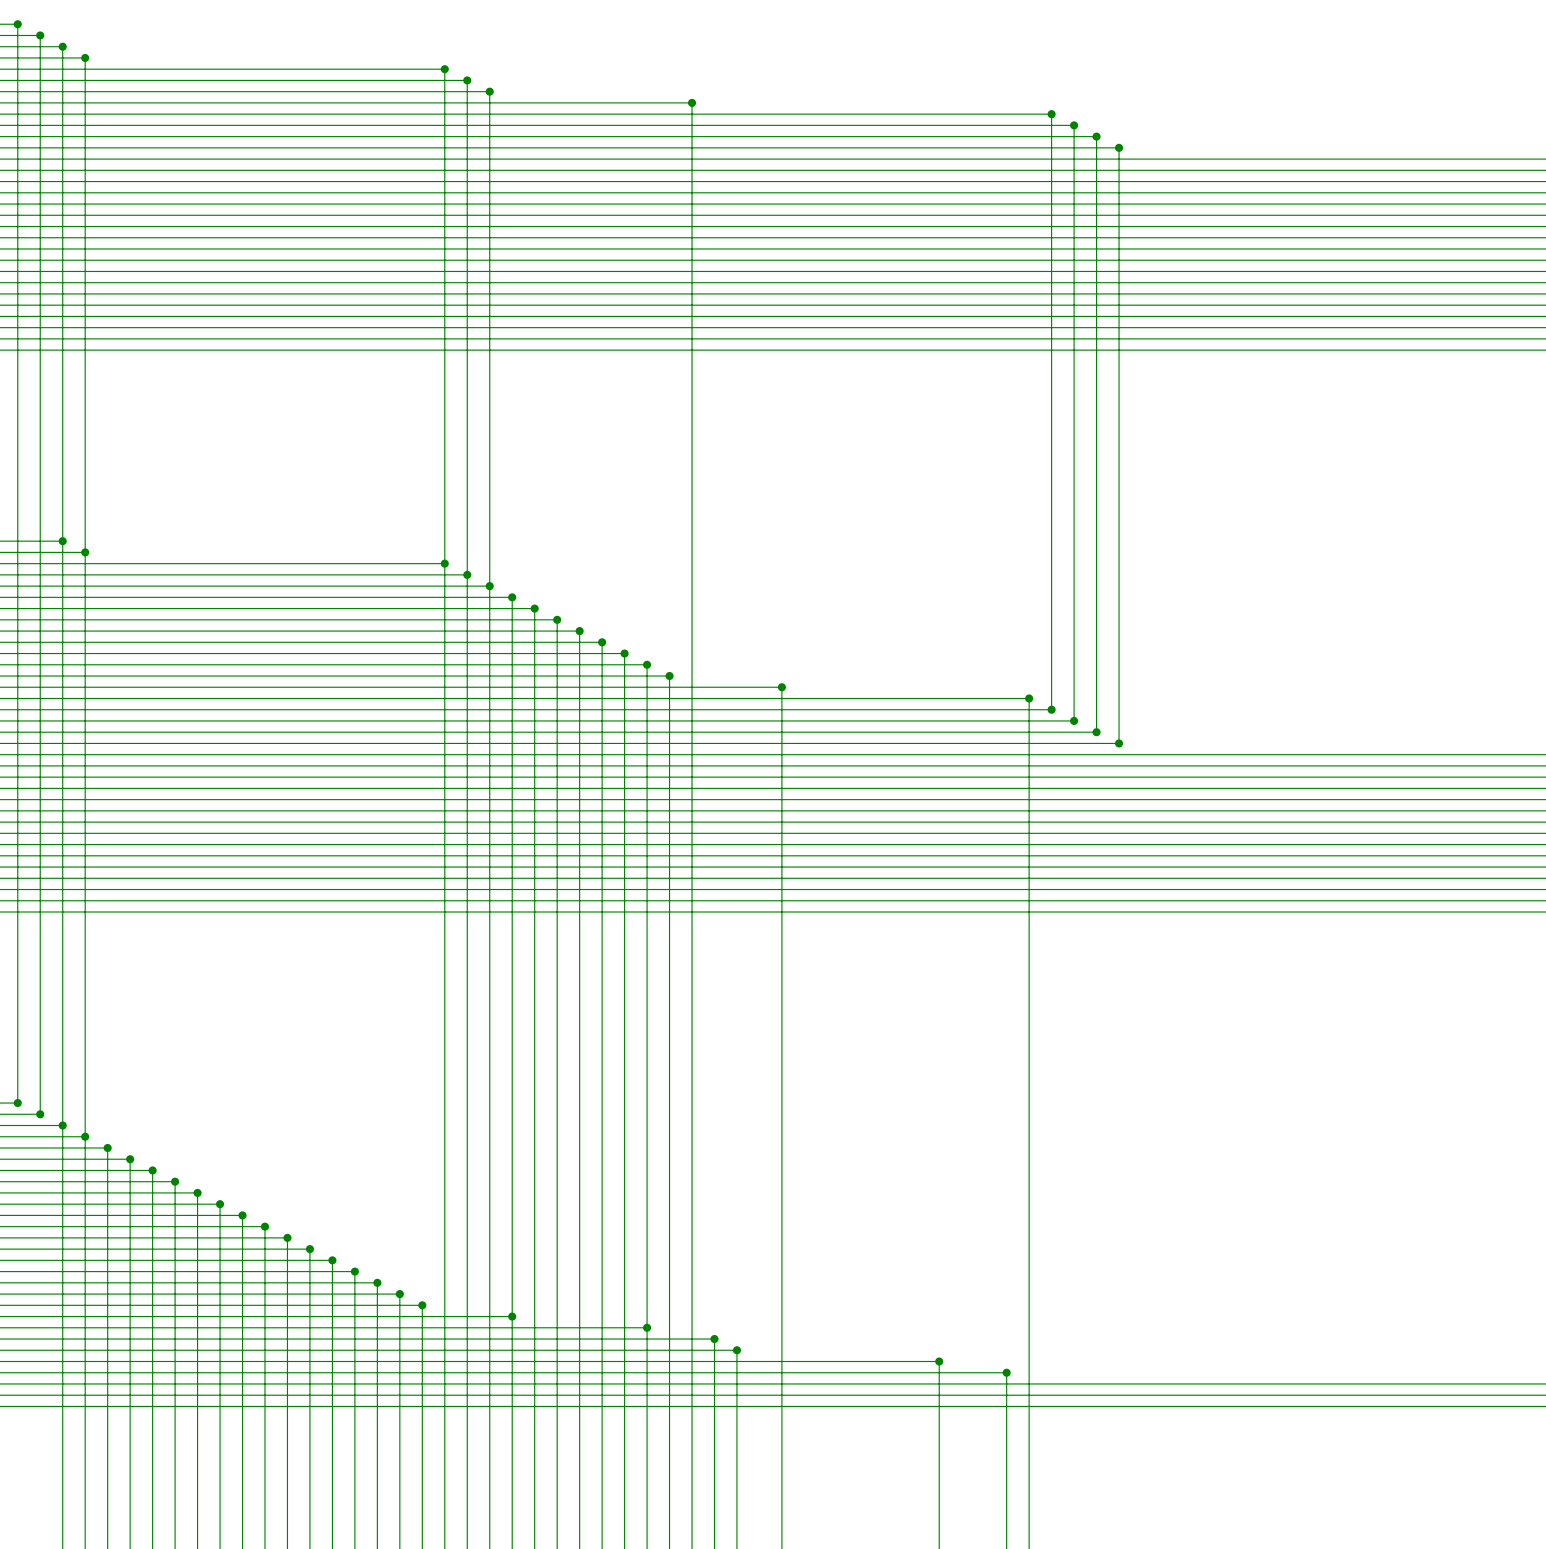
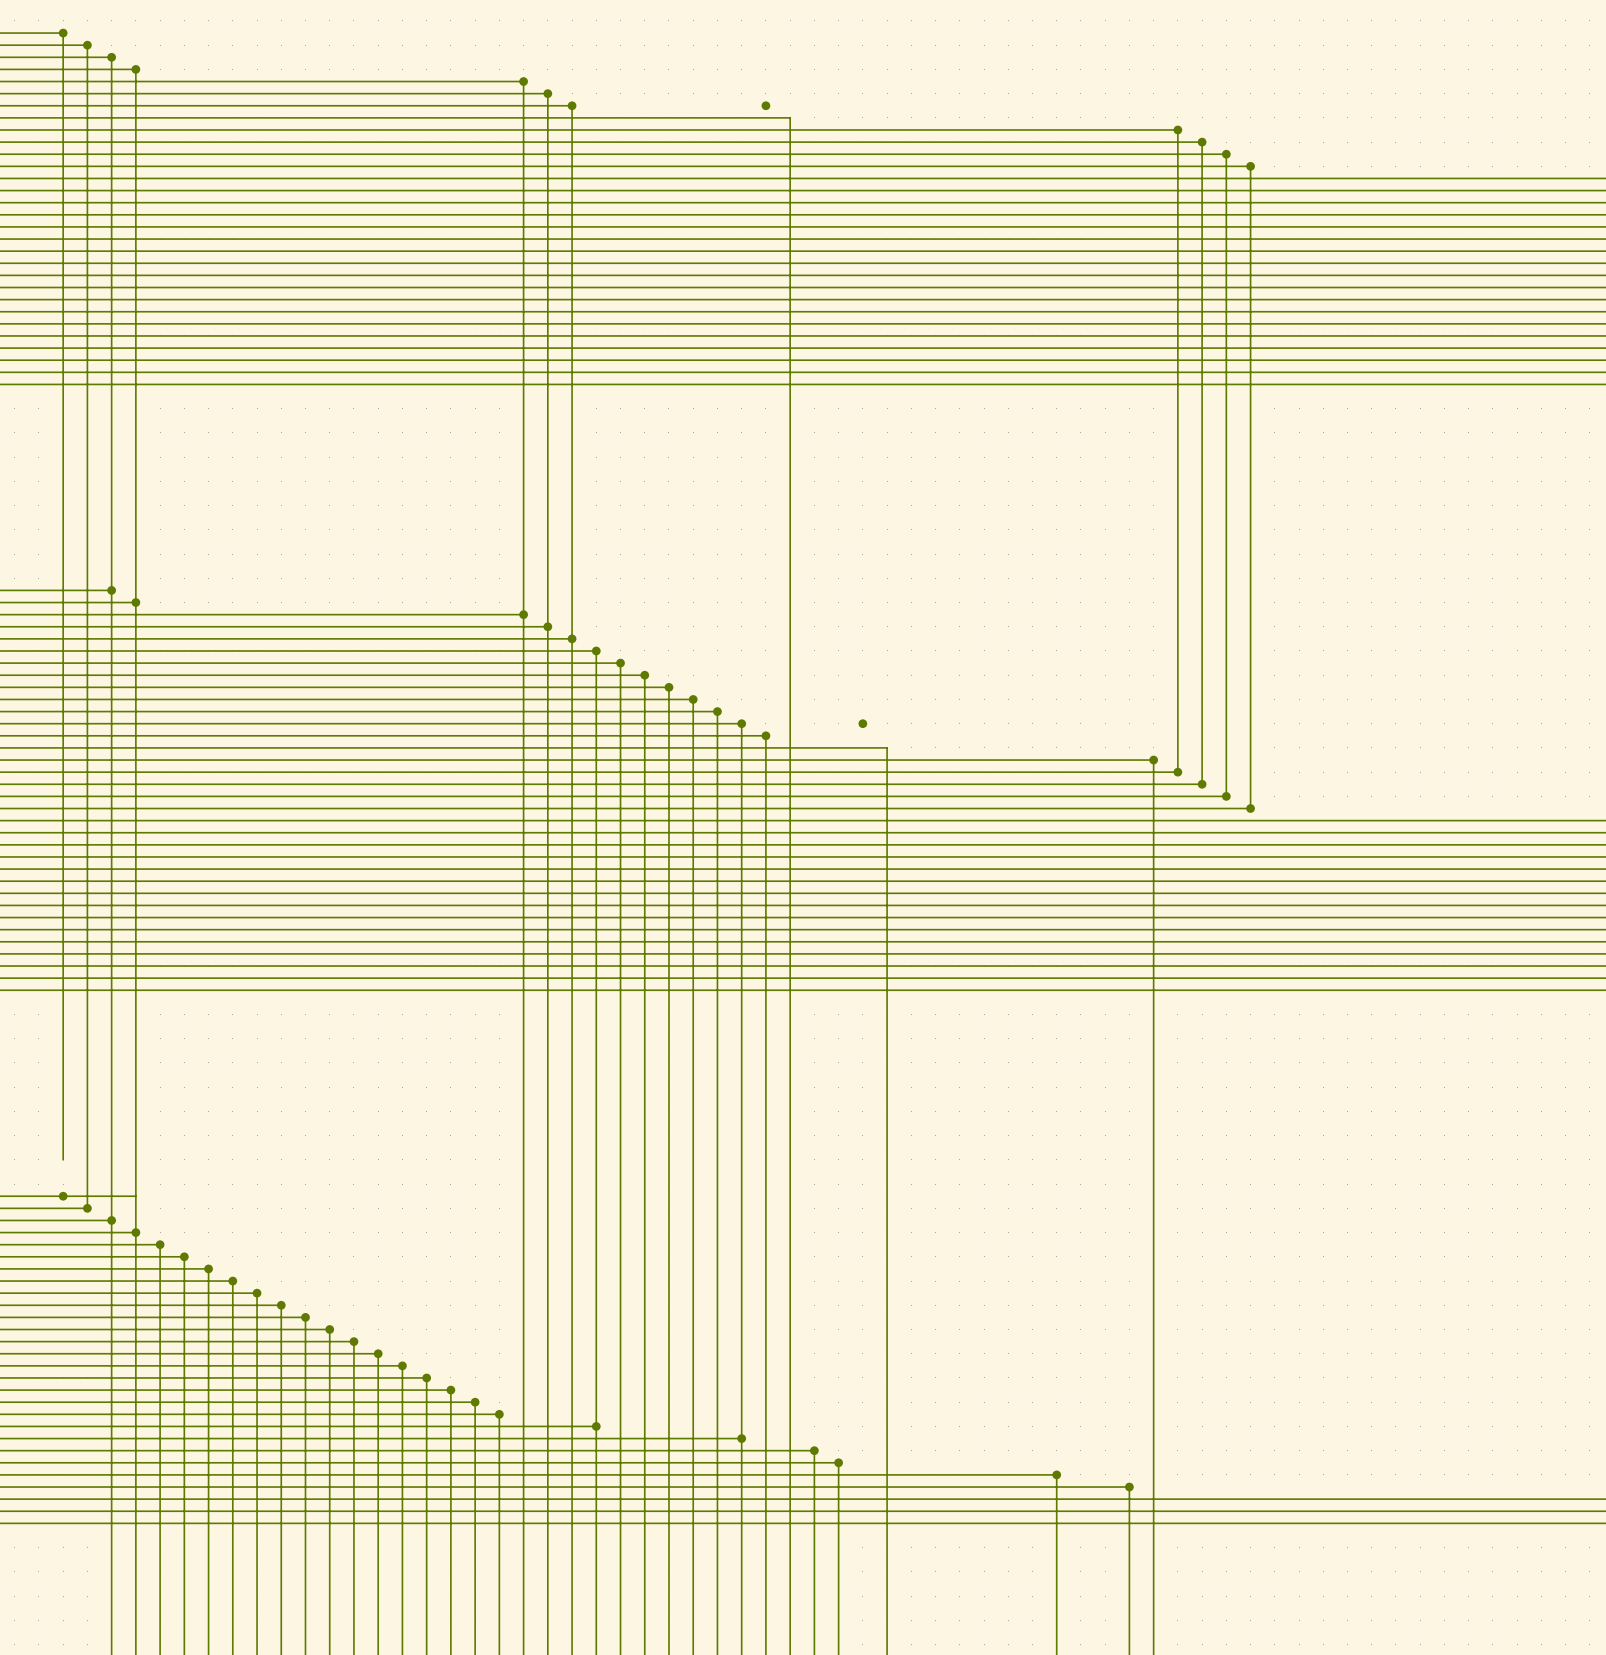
junction position: (692, 102) -> (765, 105)
junction position: (781, 687) -> (862, 723)
wire: (17, 1069) (17, 1103) -> (135, 1196) (63, 1196)

